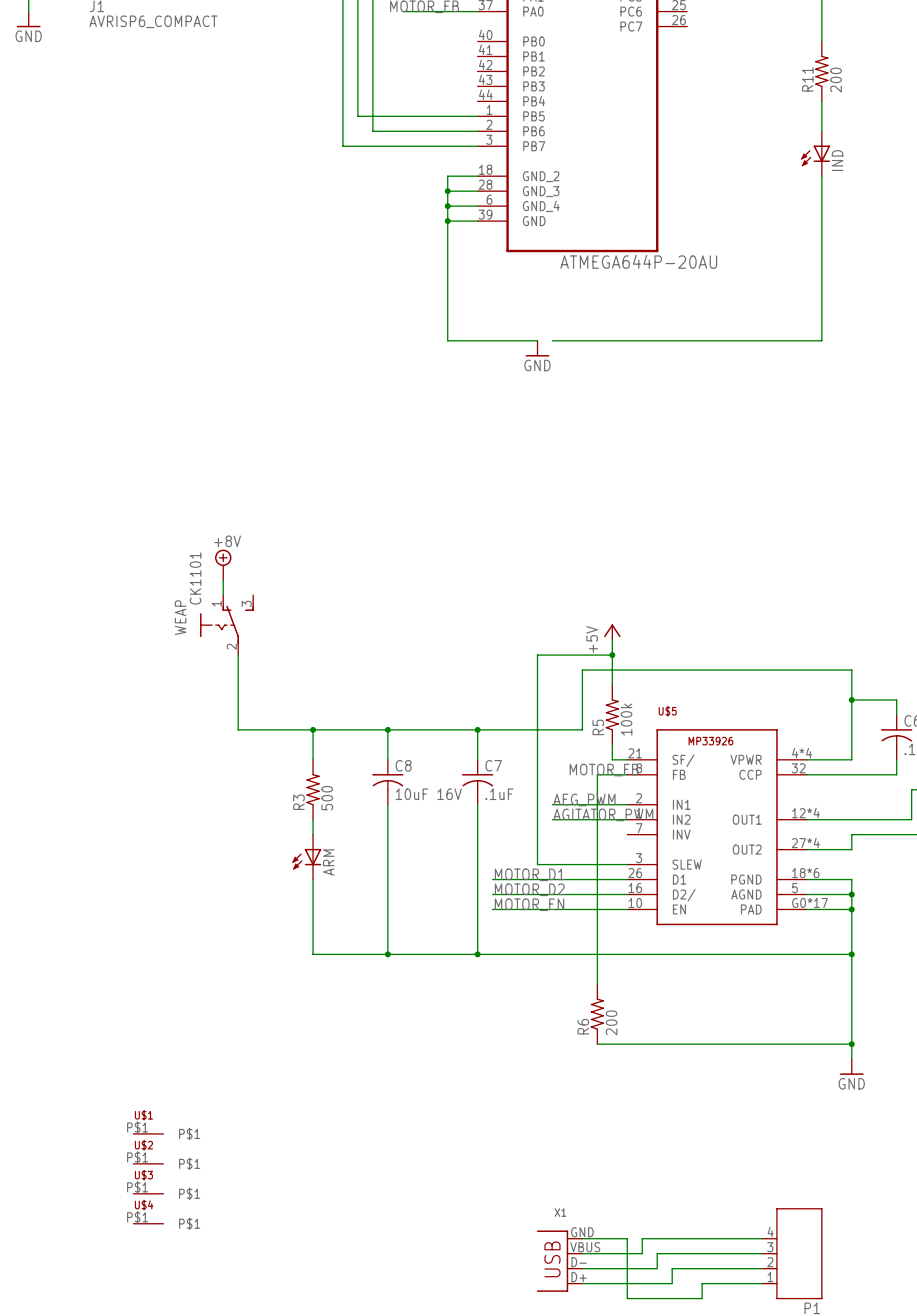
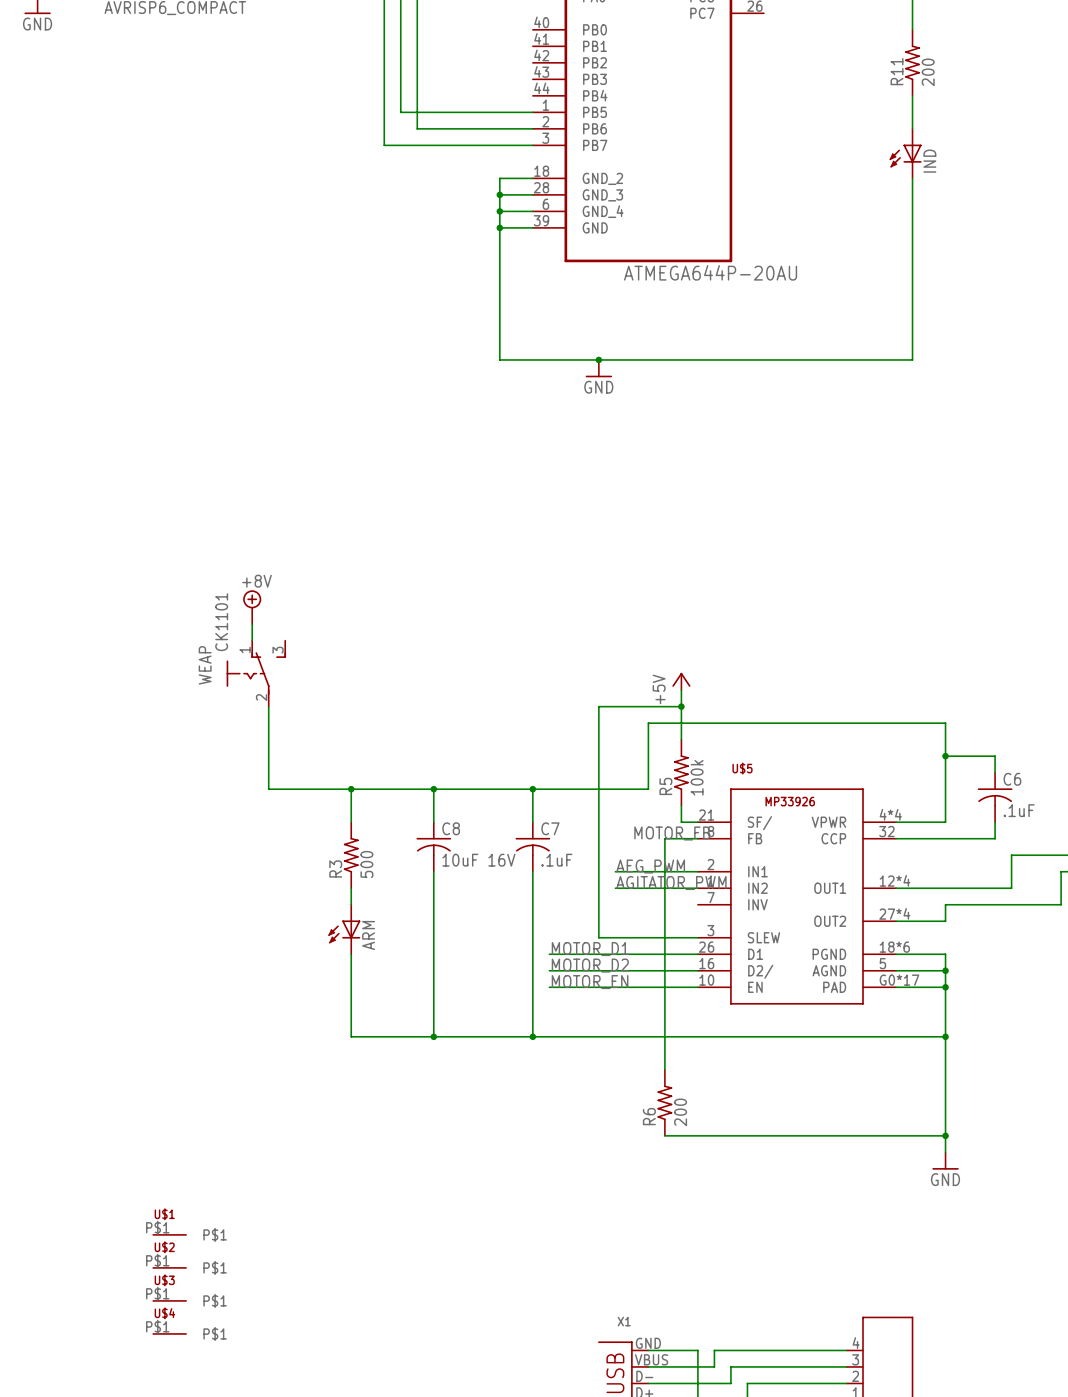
wire: none -> (598, 359) (615, 359)
junction: none -> (598, 359)

